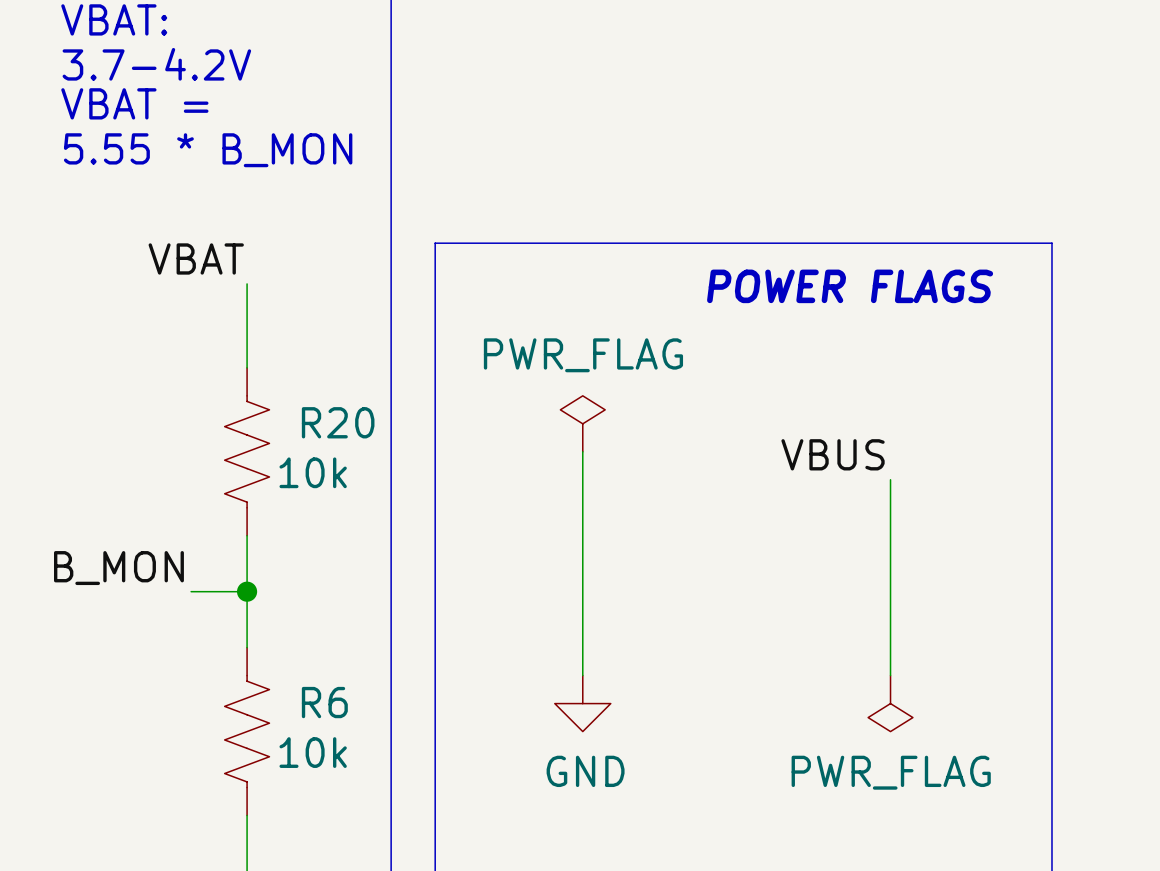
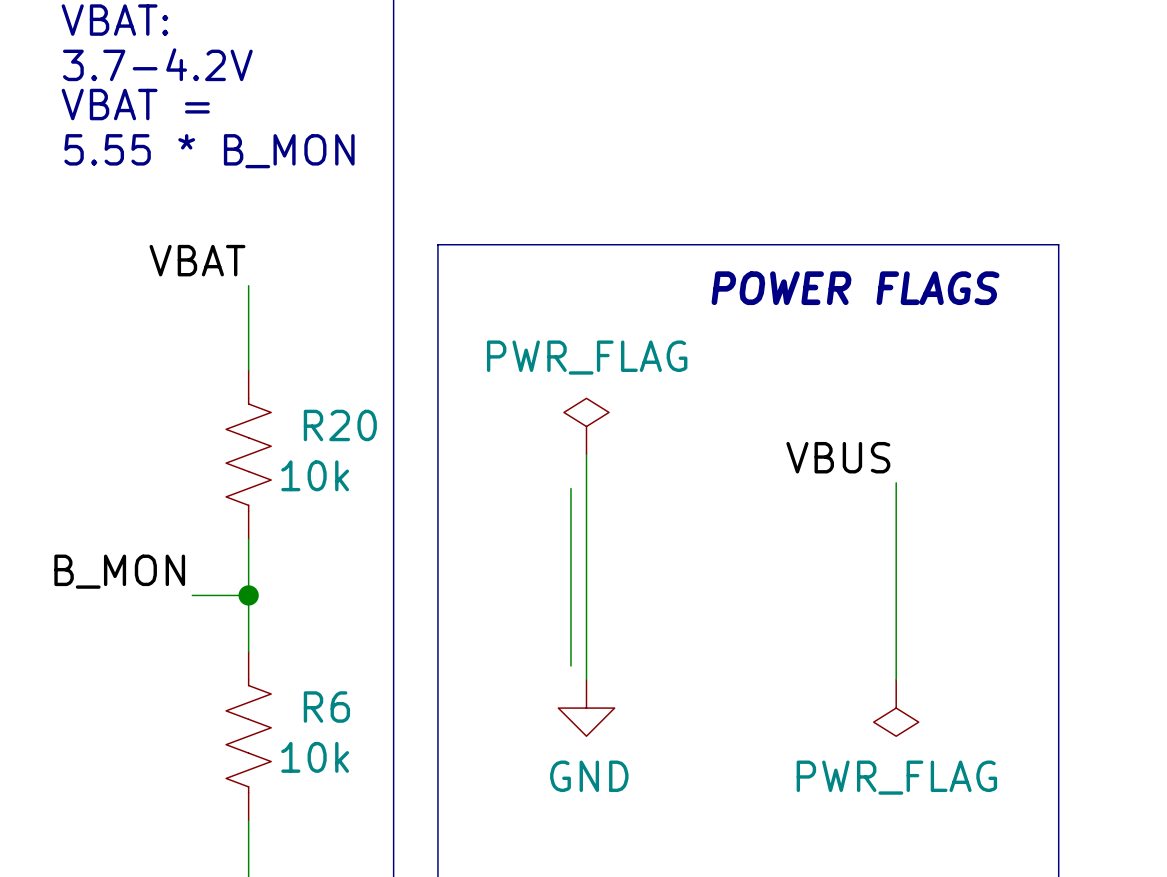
wire: none -> (570, 488) (570, 665)

